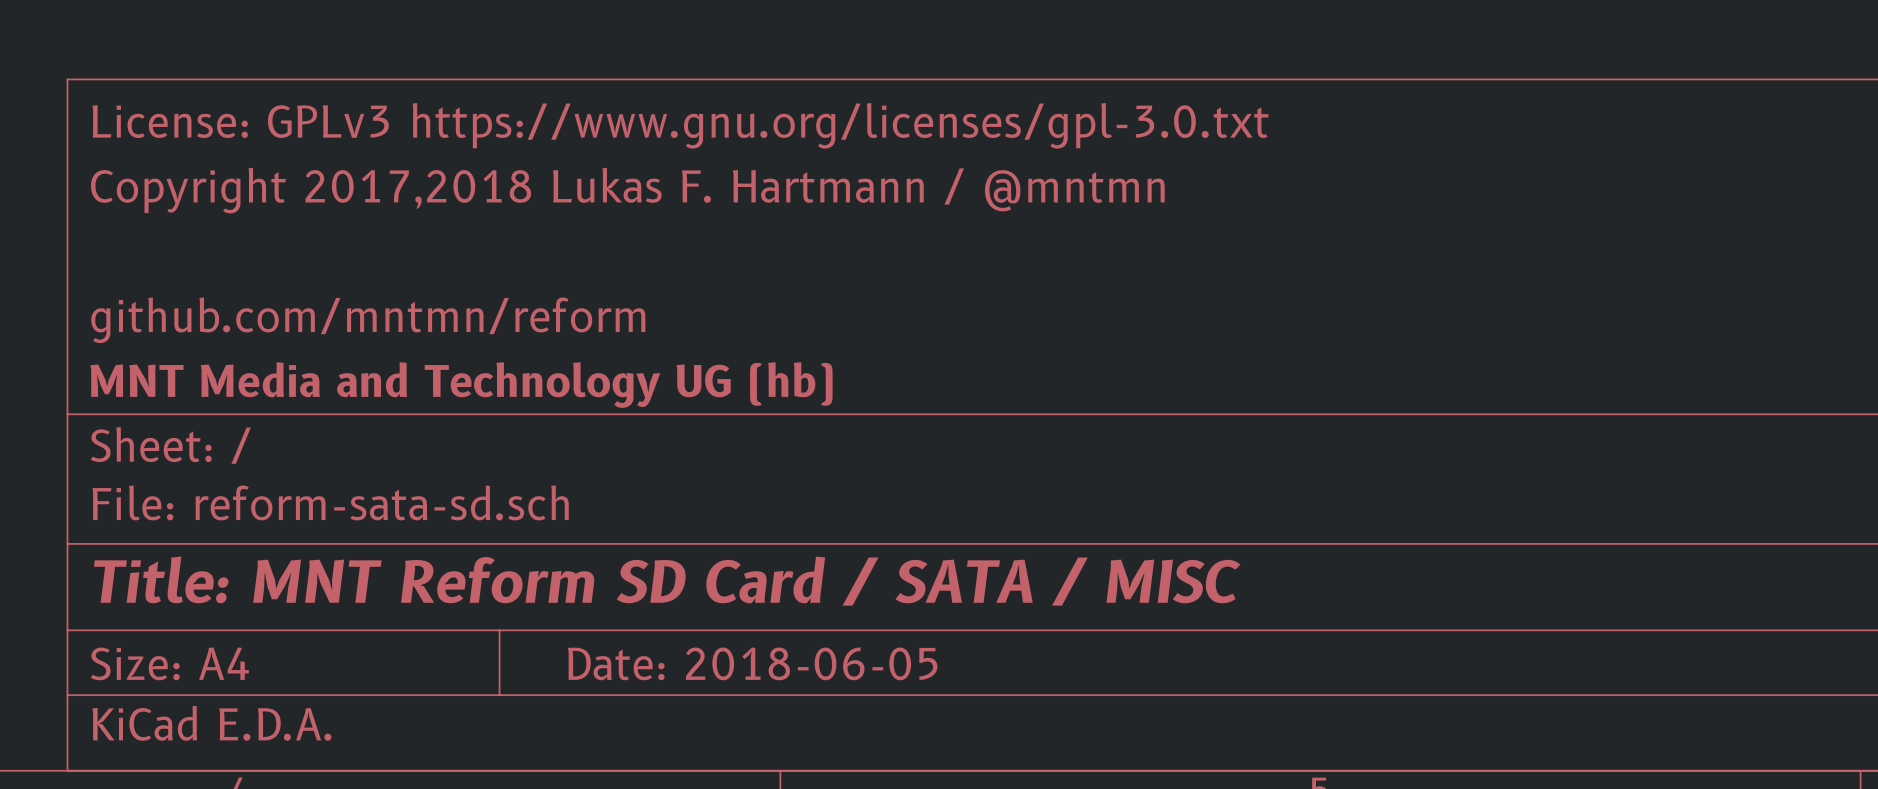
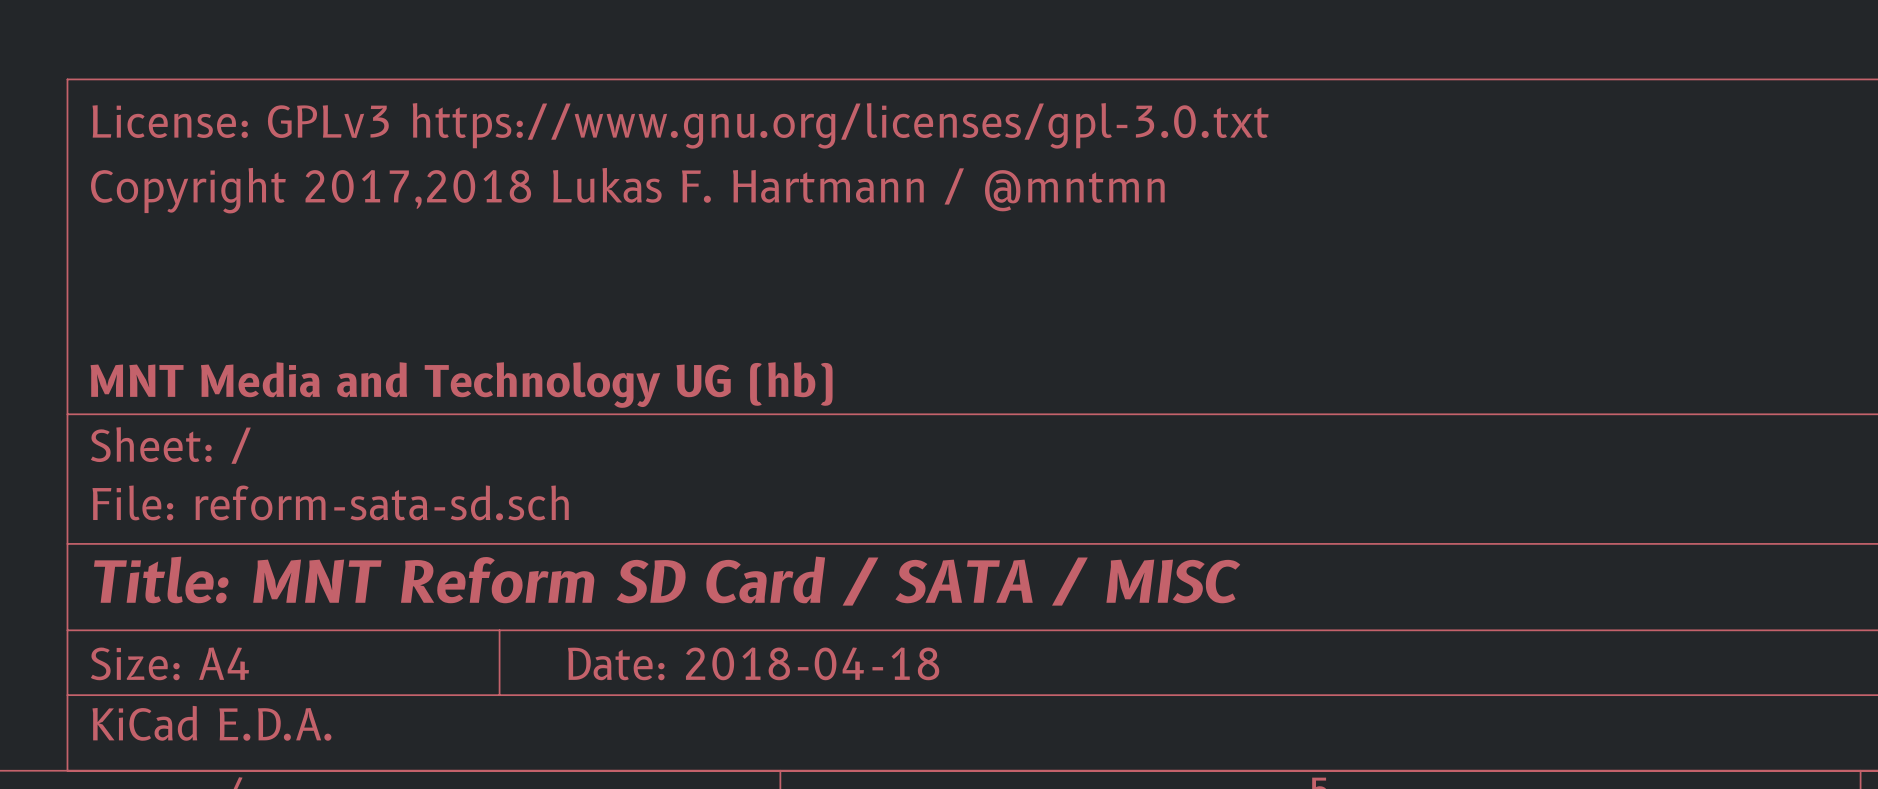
title block: github.com/mntmn/reform (368, 320) -> none
title block: Date: 2018-06-05 (752, 663) -> Date: 2018-04-18 (753, 663)

